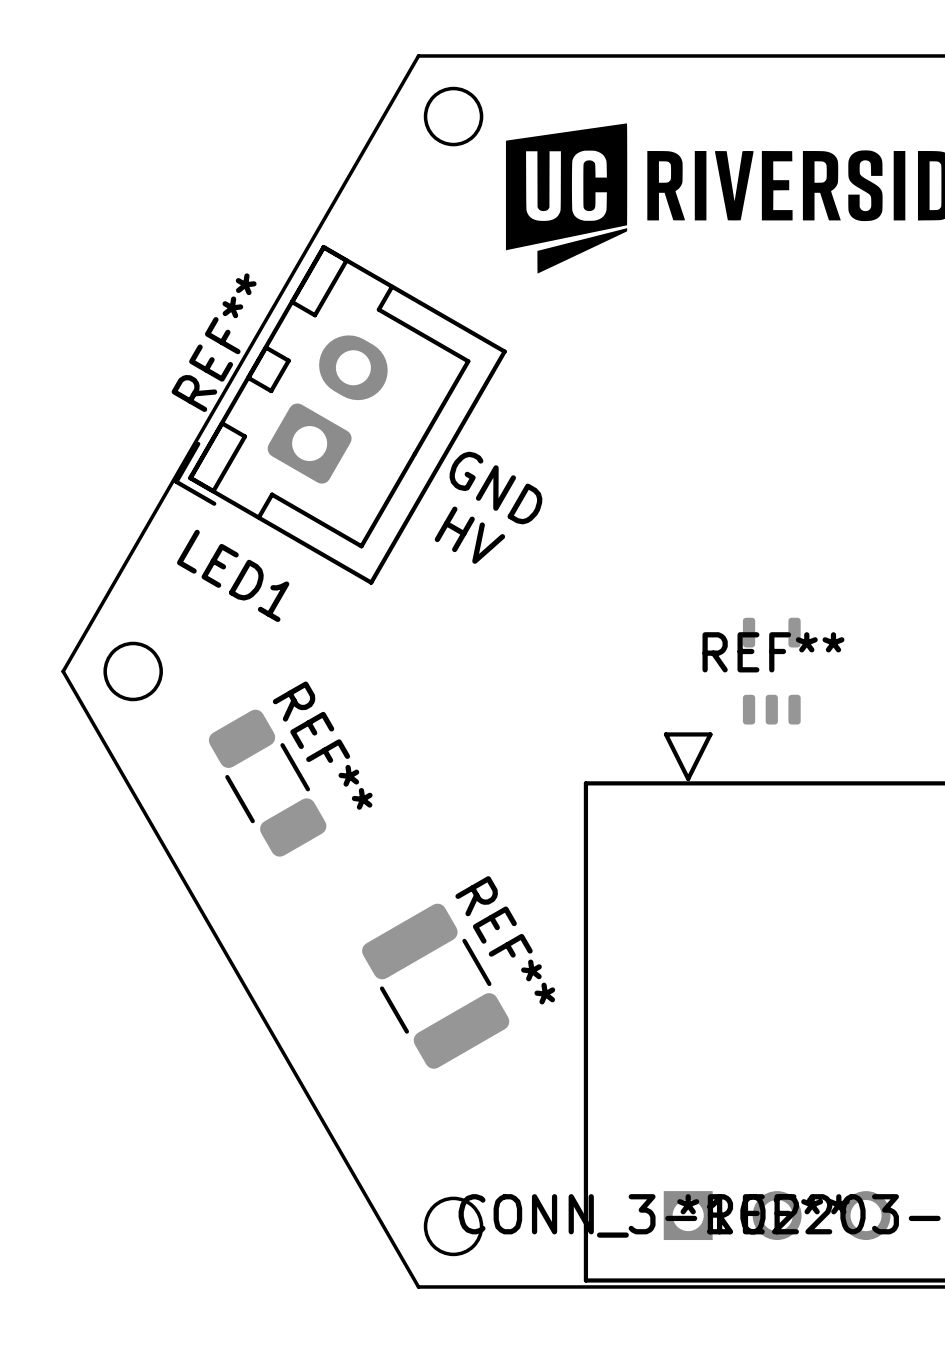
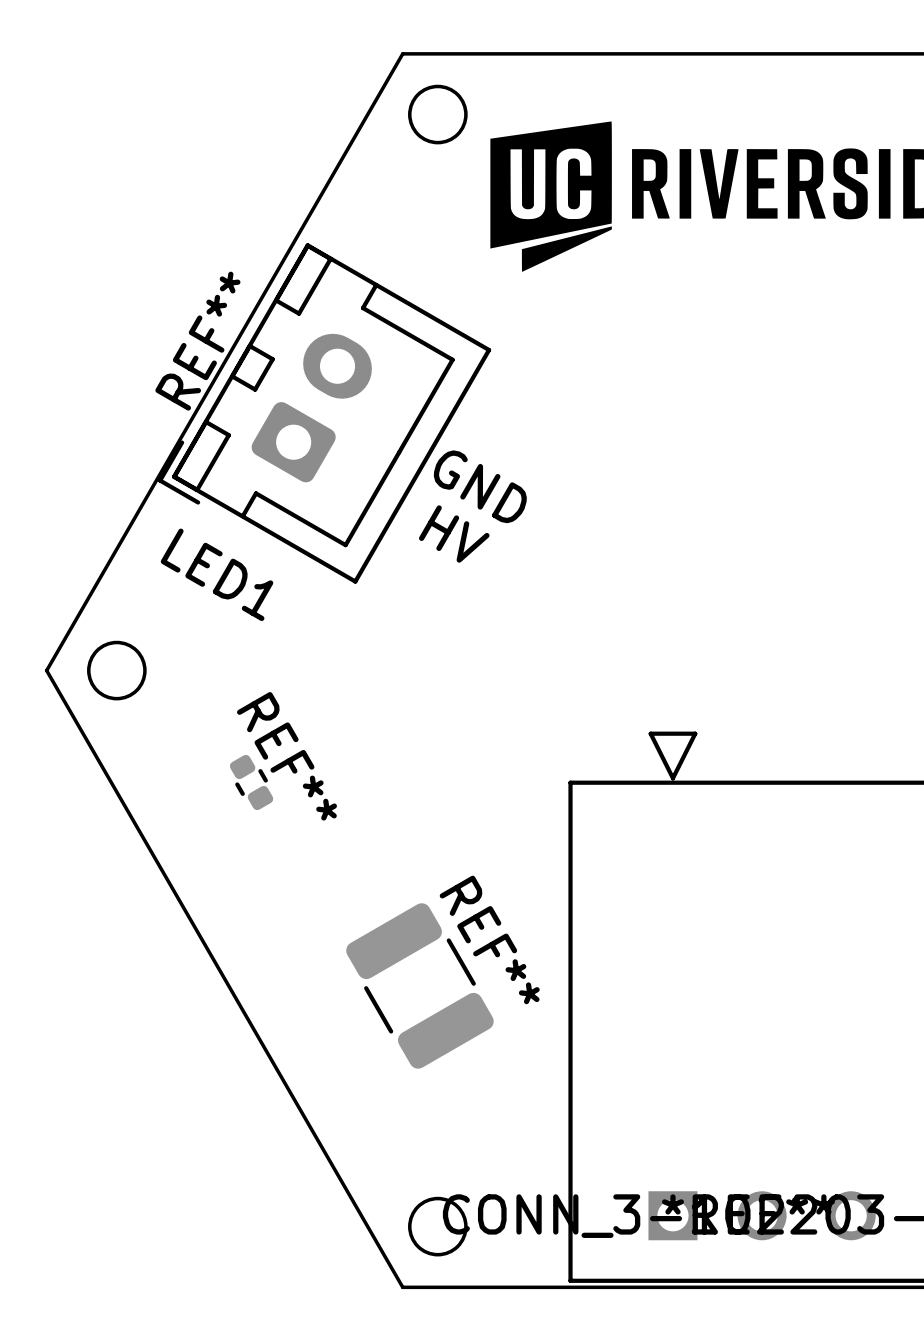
REF**: (771, 671) -> none
REF** footprint: [208, 709, 327, 857] -> [229, 754, 274, 811]

